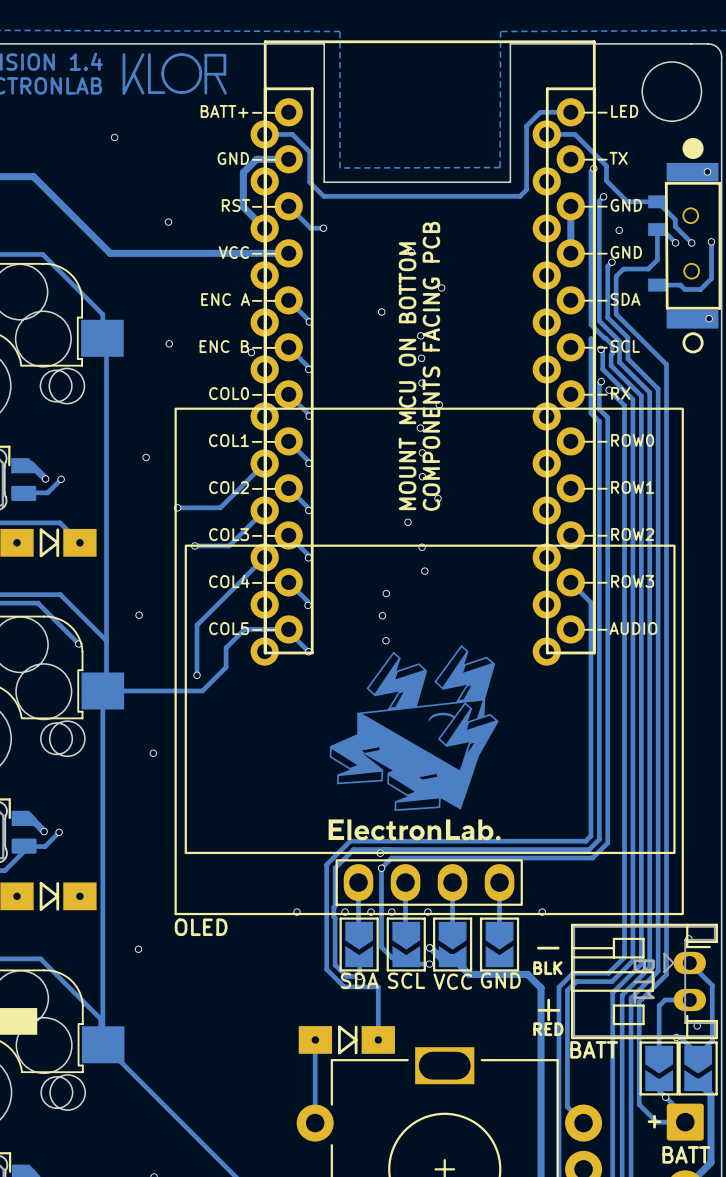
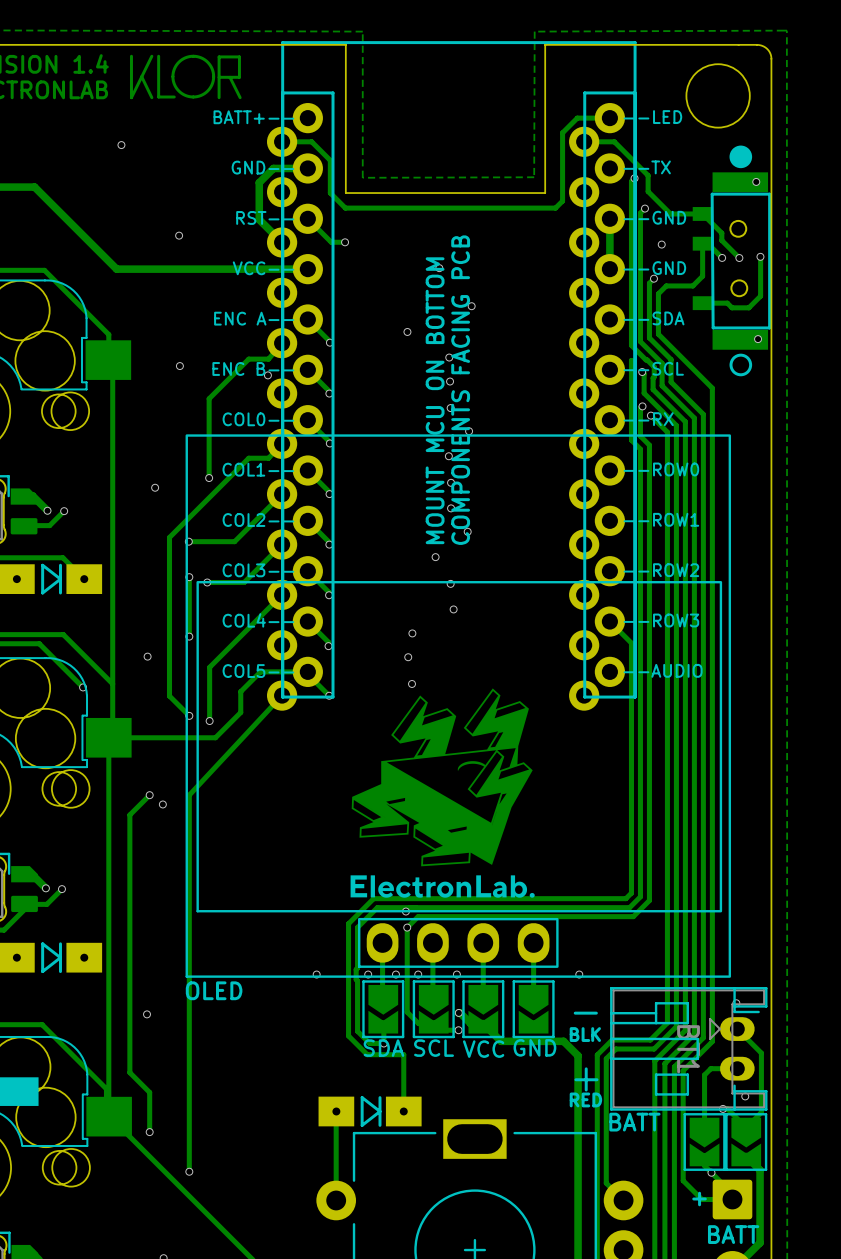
track: none -> (282, 343) (268, 359) (248, 359) (209, 398) (209, 478)
track: none -> (282, 443) (268, 458) (248, 458) (169, 537) (169, 696) (189, 715)
via: none -> (209, 478)
track: none -> (189, 577) (189, 636)
via: none -> (189, 577)
via: none -> (189, 636)
track: none -> (282, 695) (189, 795) (189, 1171)
via: none -> (189, 715)
track: none -> (149, 795) (129, 814) (129, 1072) (149, 1092) (149, 1132)
via: none -> (149, 795)
via: none -> (149, 1132)
via: none -> (189, 1171)

